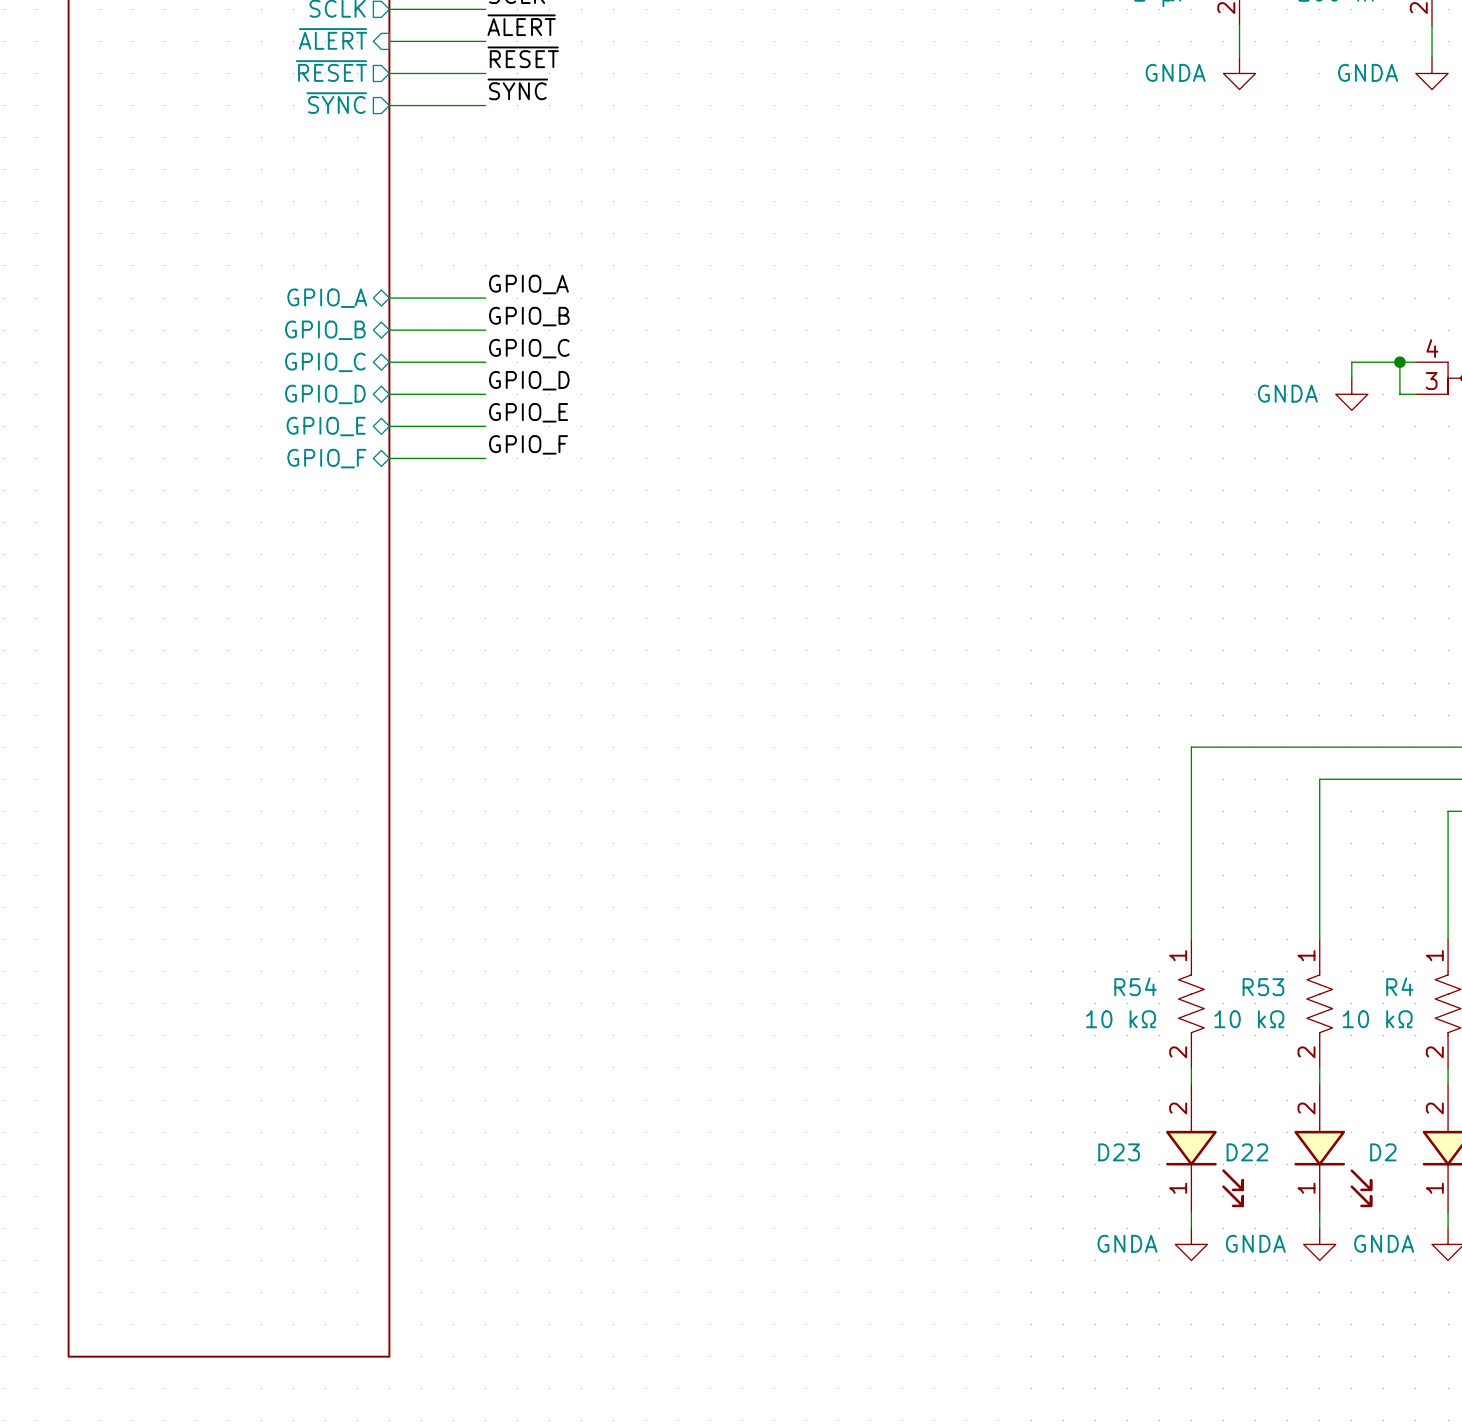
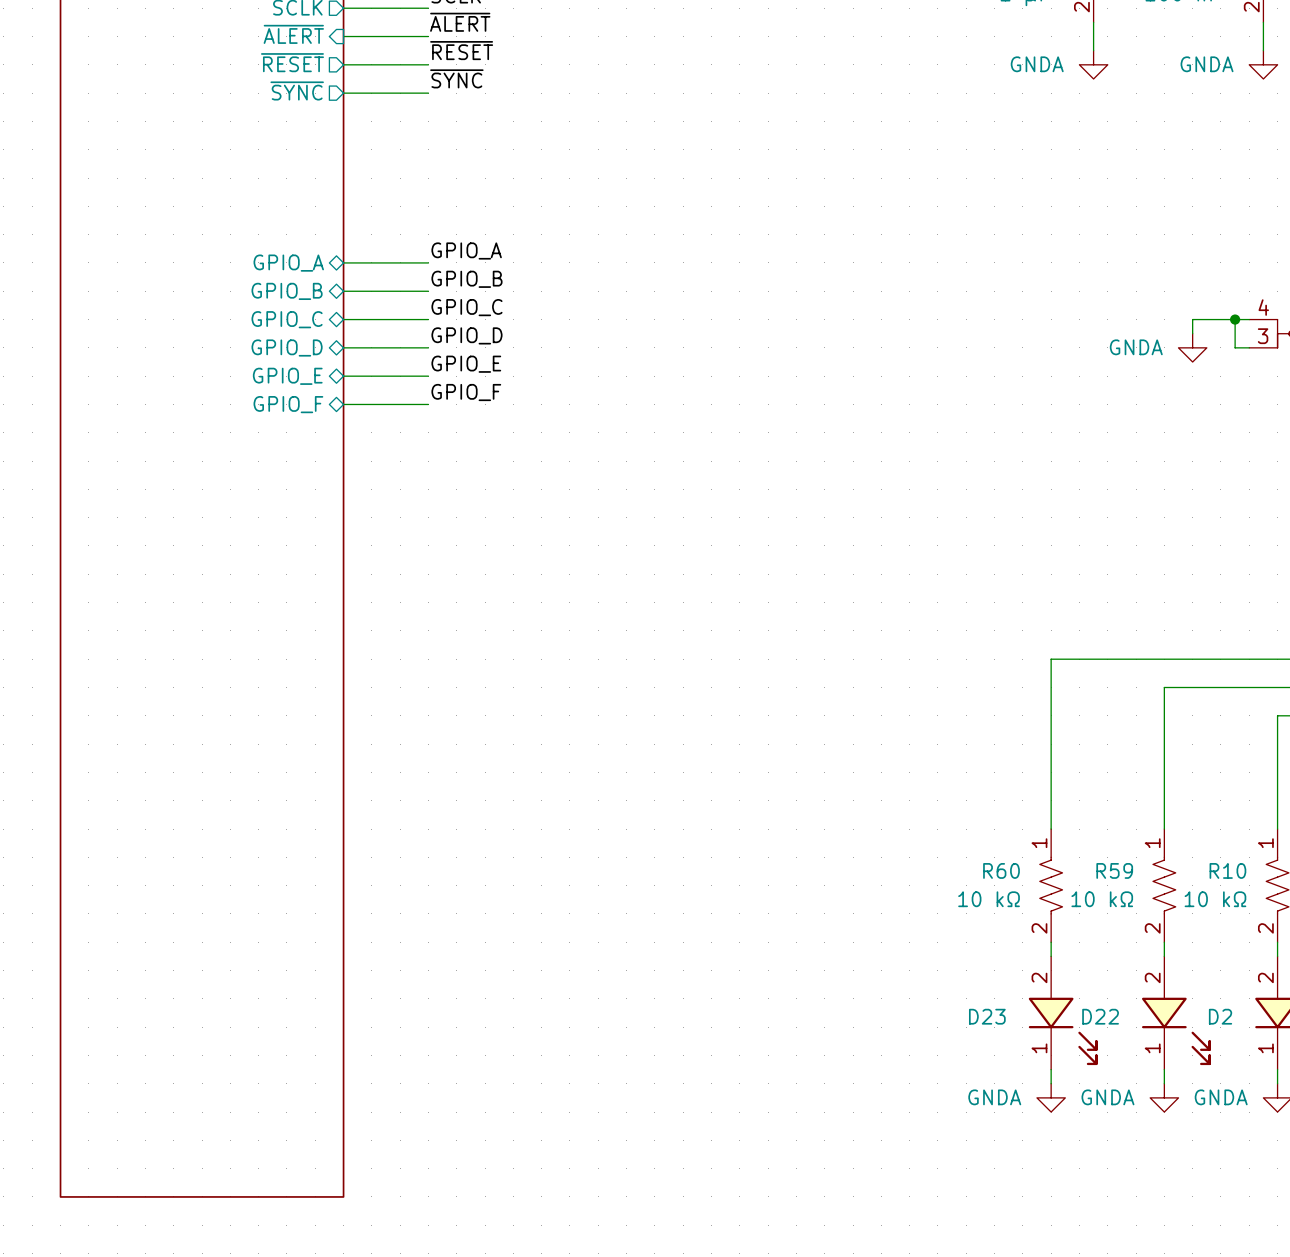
R54 name: R54 (1135, 986) -> R60 (1001, 870)
R4 name: R4 (1399, 986) -> R10 (1227, 870)
R53 name: R53 (1263, 987) -> R59 (1114, 870)

